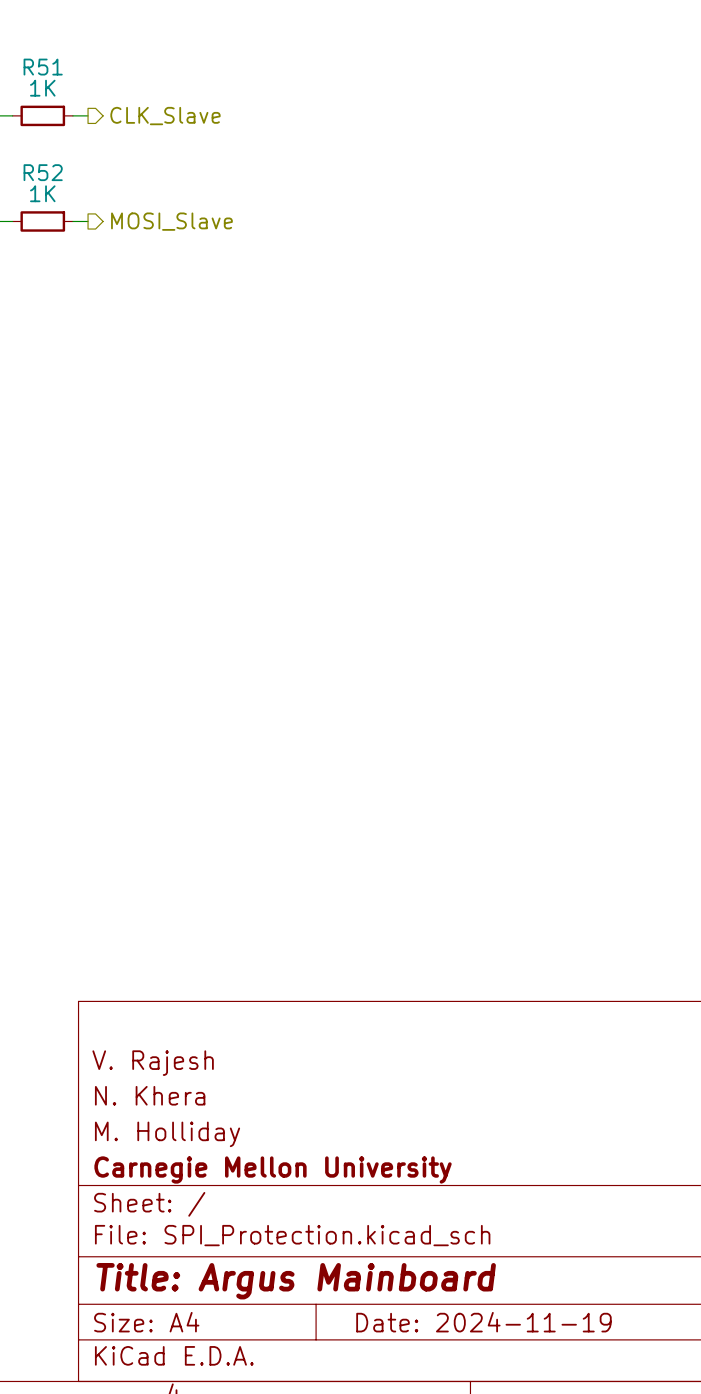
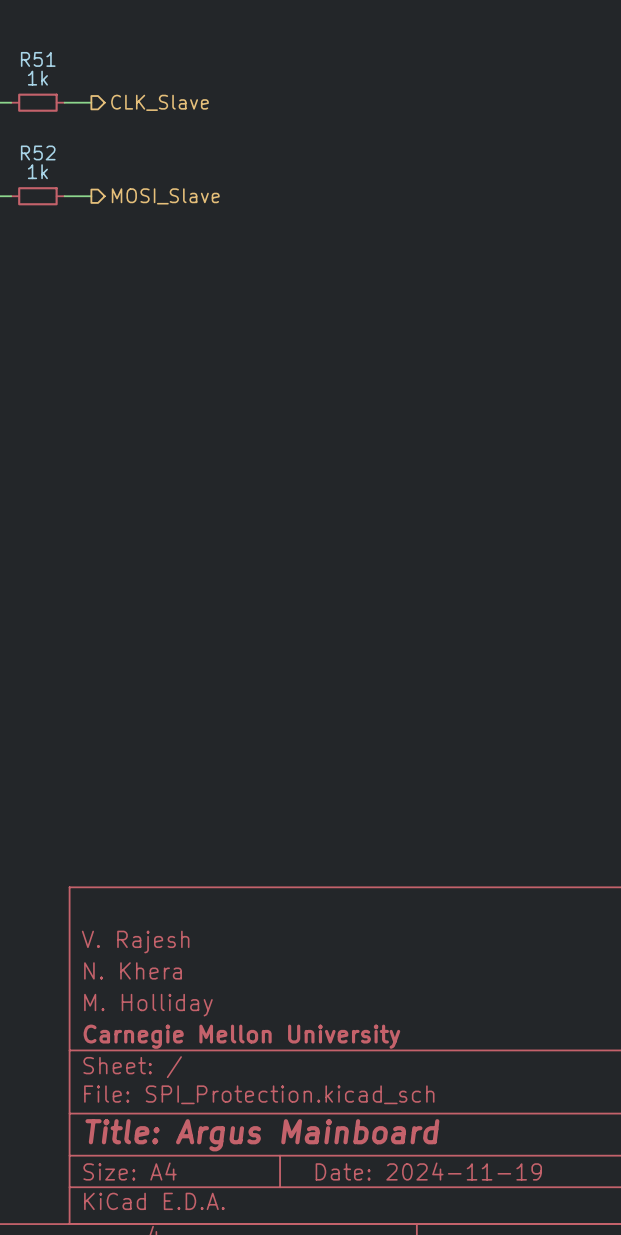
R51 value: 1K (42, 88) -> 1k (37, 78)
wire: none -> (78, 102) (91, 102)
hierarchical label position: CLK_Slave (165, 116) -> CLK_Slave (159, 102)
R52 value: 1K (42, 193) -> 1k (37, 171)
wire: none -> (78, 196) (91, 196)
hierarchical label position: MOSI_Slave (171, 221) -> MOSI_Slave (165, 196)

